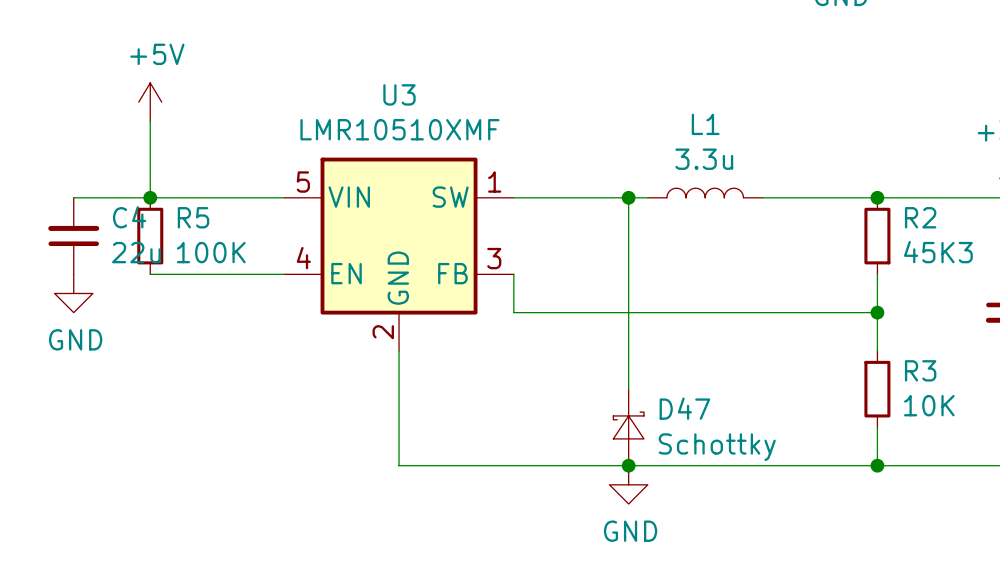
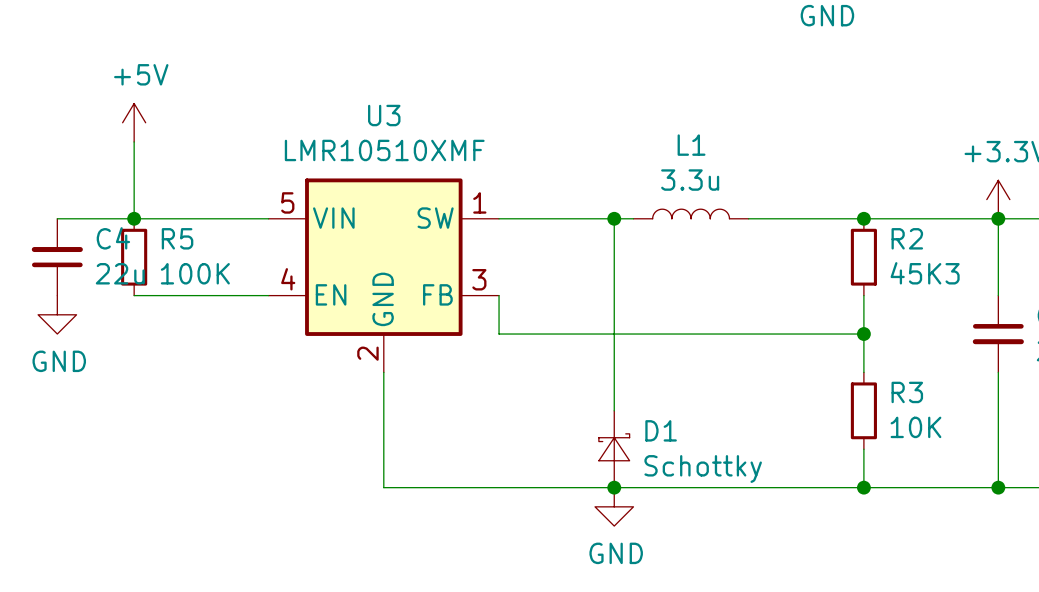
D47 name: D47 (684, 408) -> D1 (661, 430)

